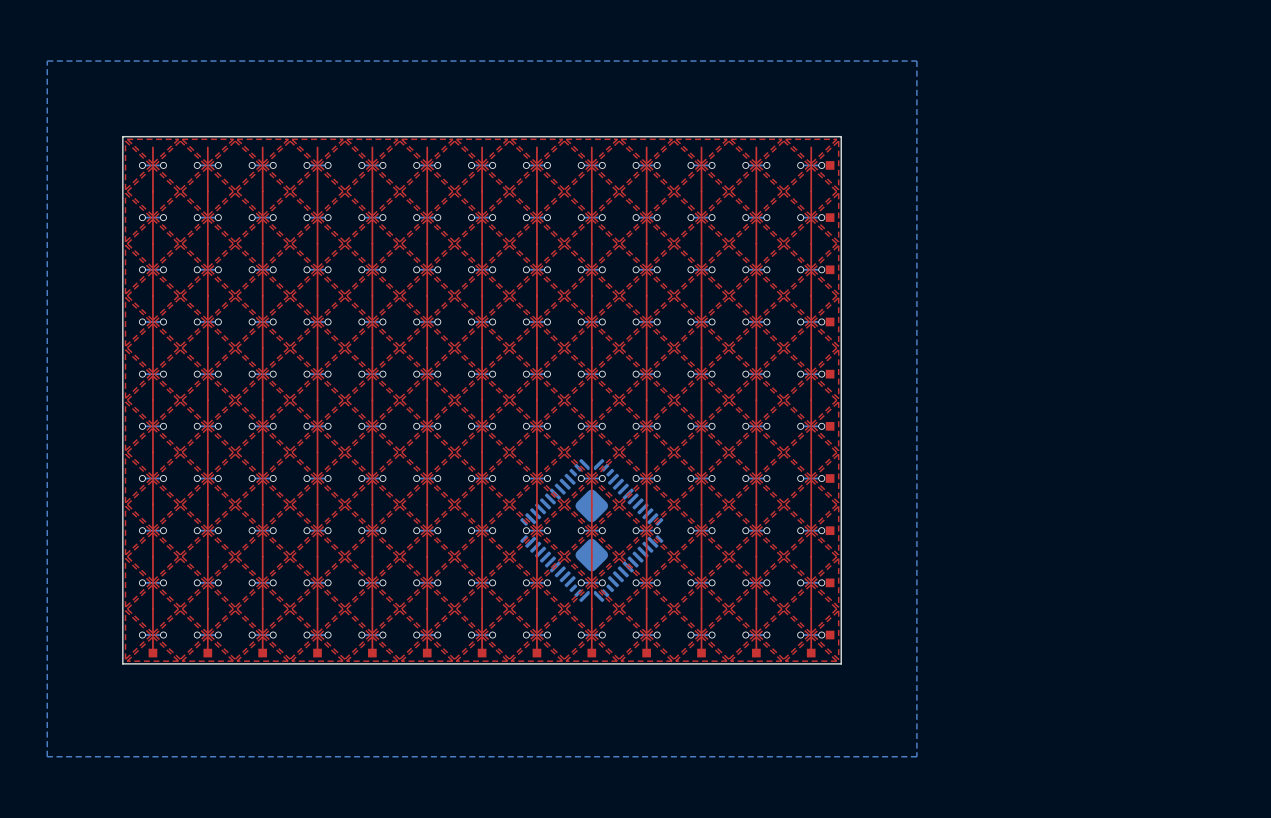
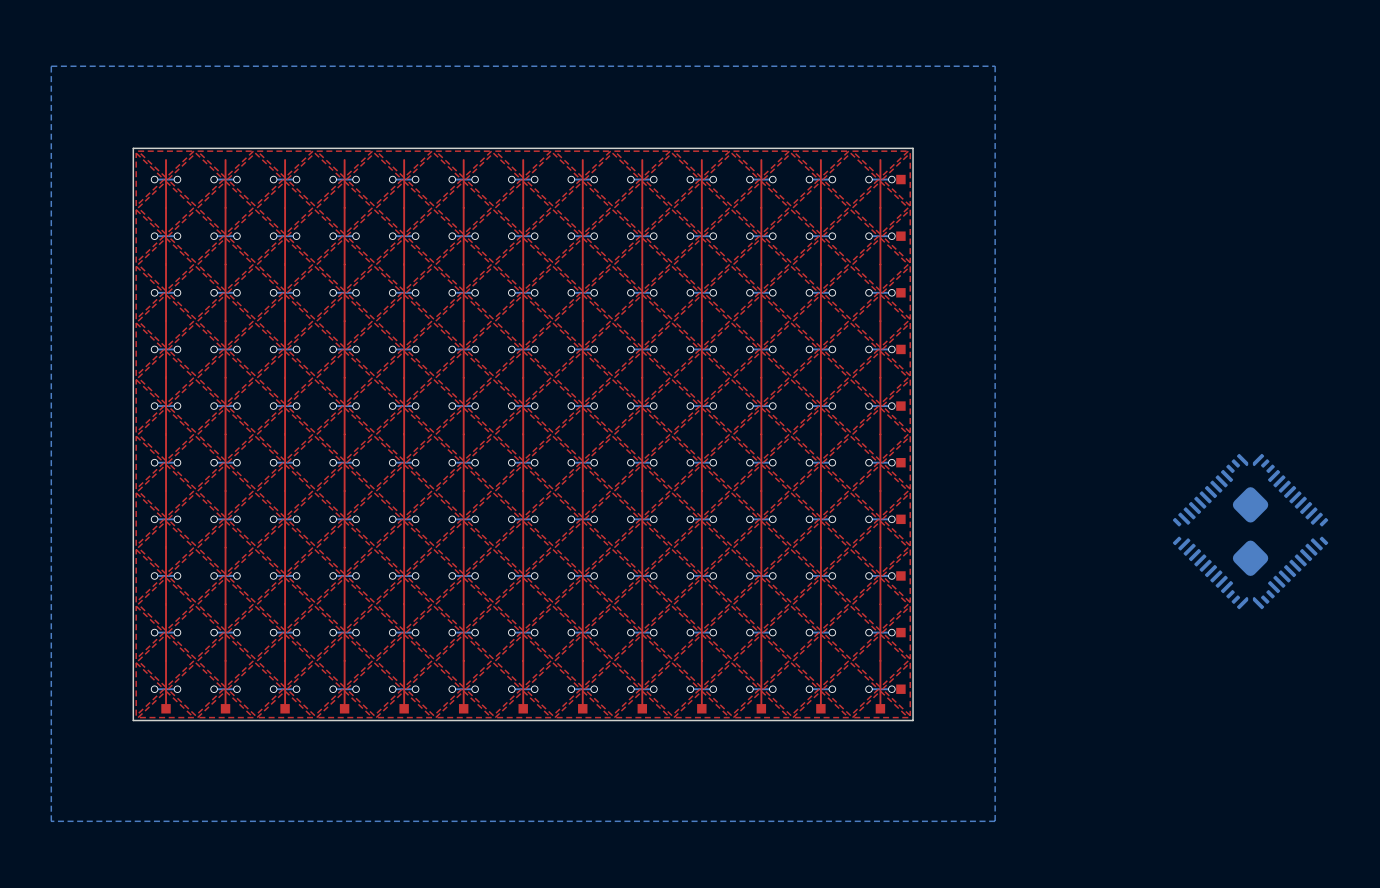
part: none -> (1250, 531)
part: (591, 530) -> none

